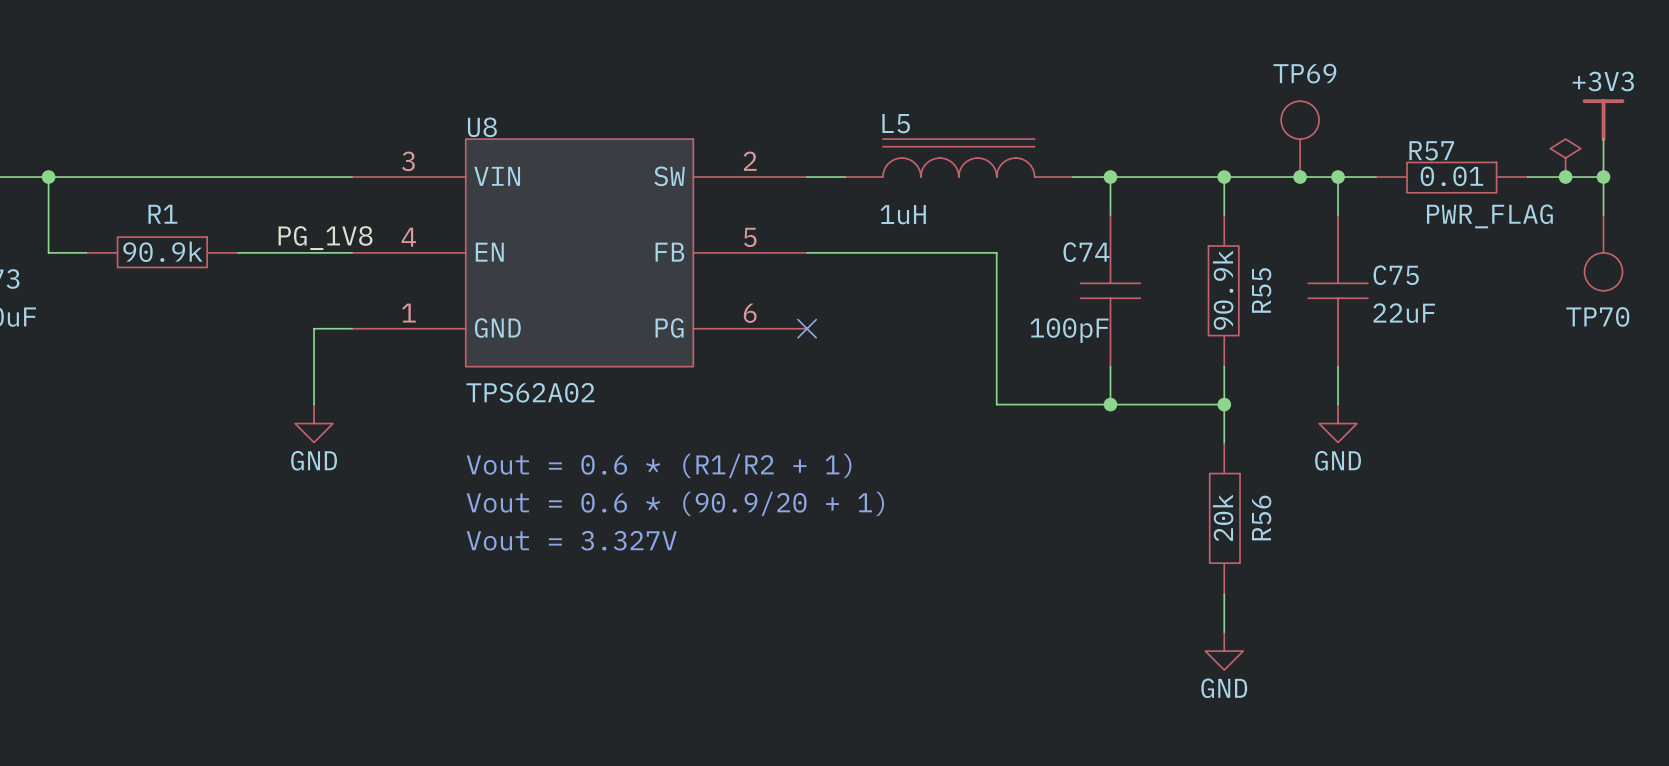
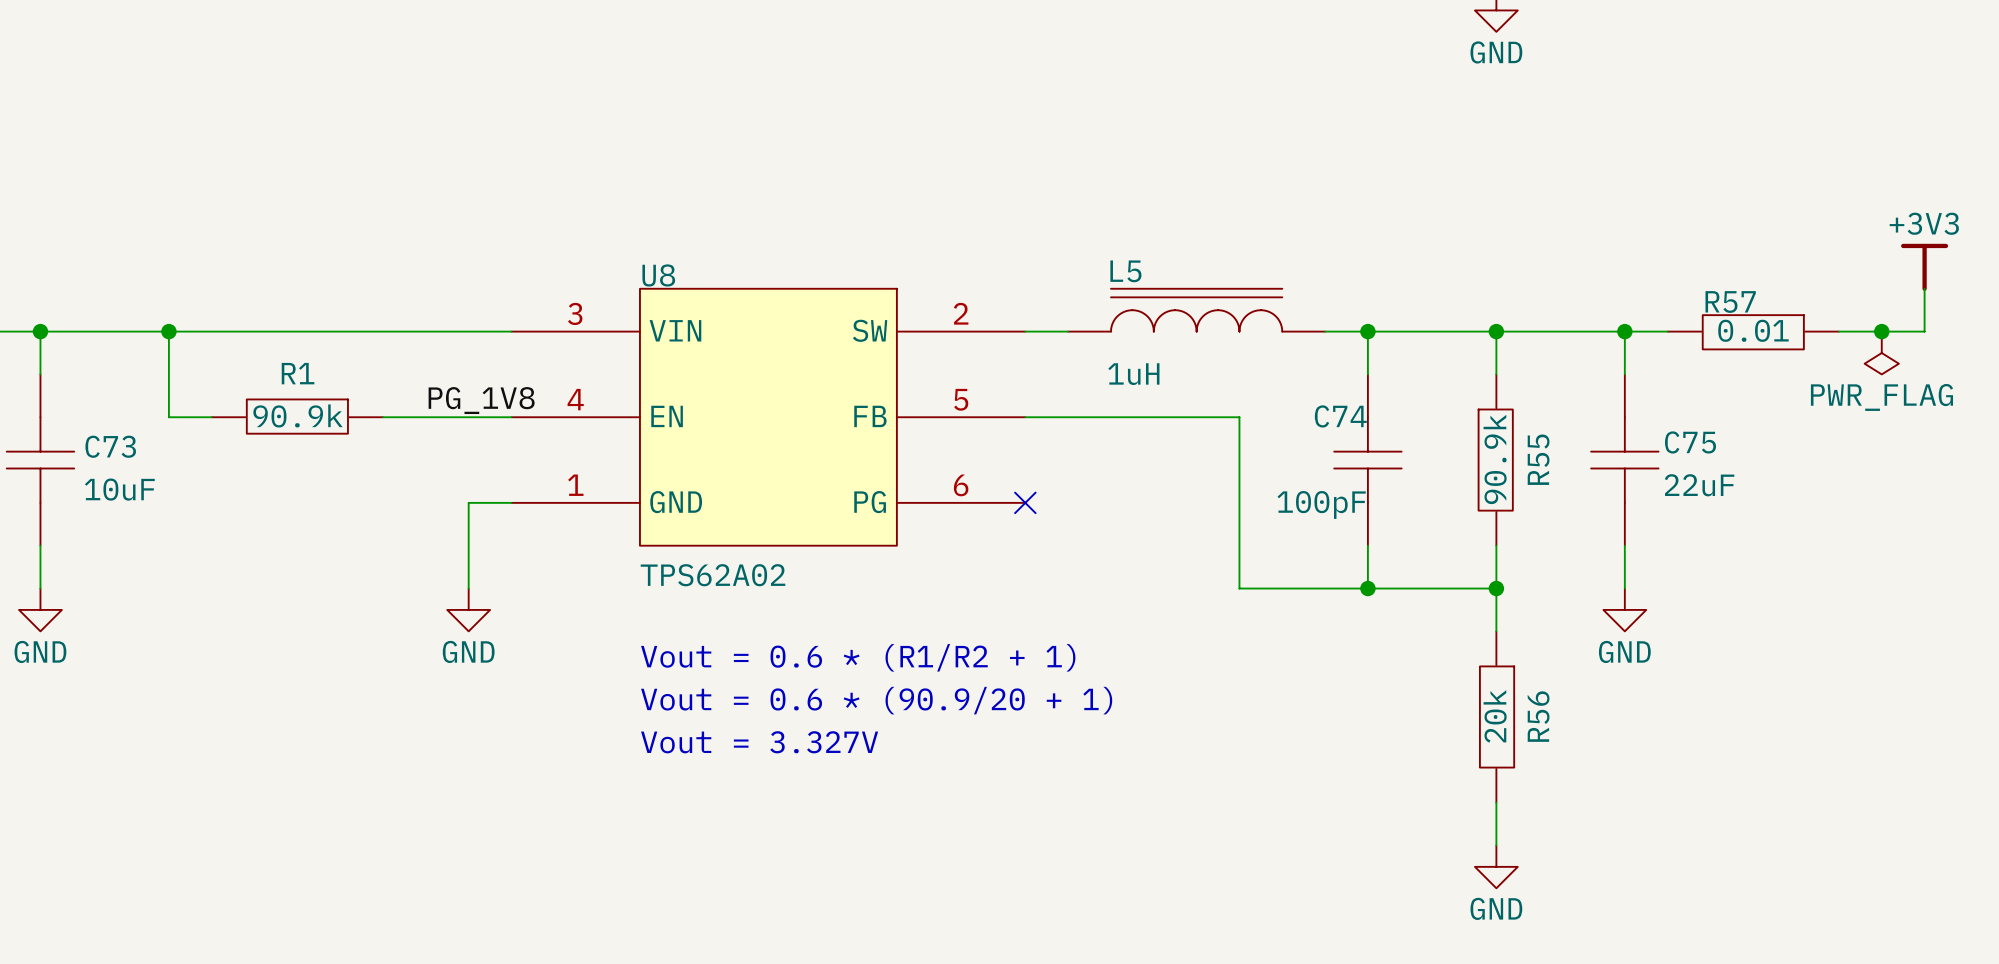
TP69: (1300, 139) -> none
power symbol rotation: 0° (1565, 158) -> 180° (1881, 353)
power symbol position: PWR_FLAG (1565, 158) -> PWR_FLAG (1881, 353)
junction: (1300, 177) -> none
wire: (1603, 177) (1603, 214) -> none
junction: (1603, 177) -> none
power symbol text position: PWR_FLAG (1489, 216) -> PWR_FLAG (1881, 397)
TP70: (1603, 252) -> none

